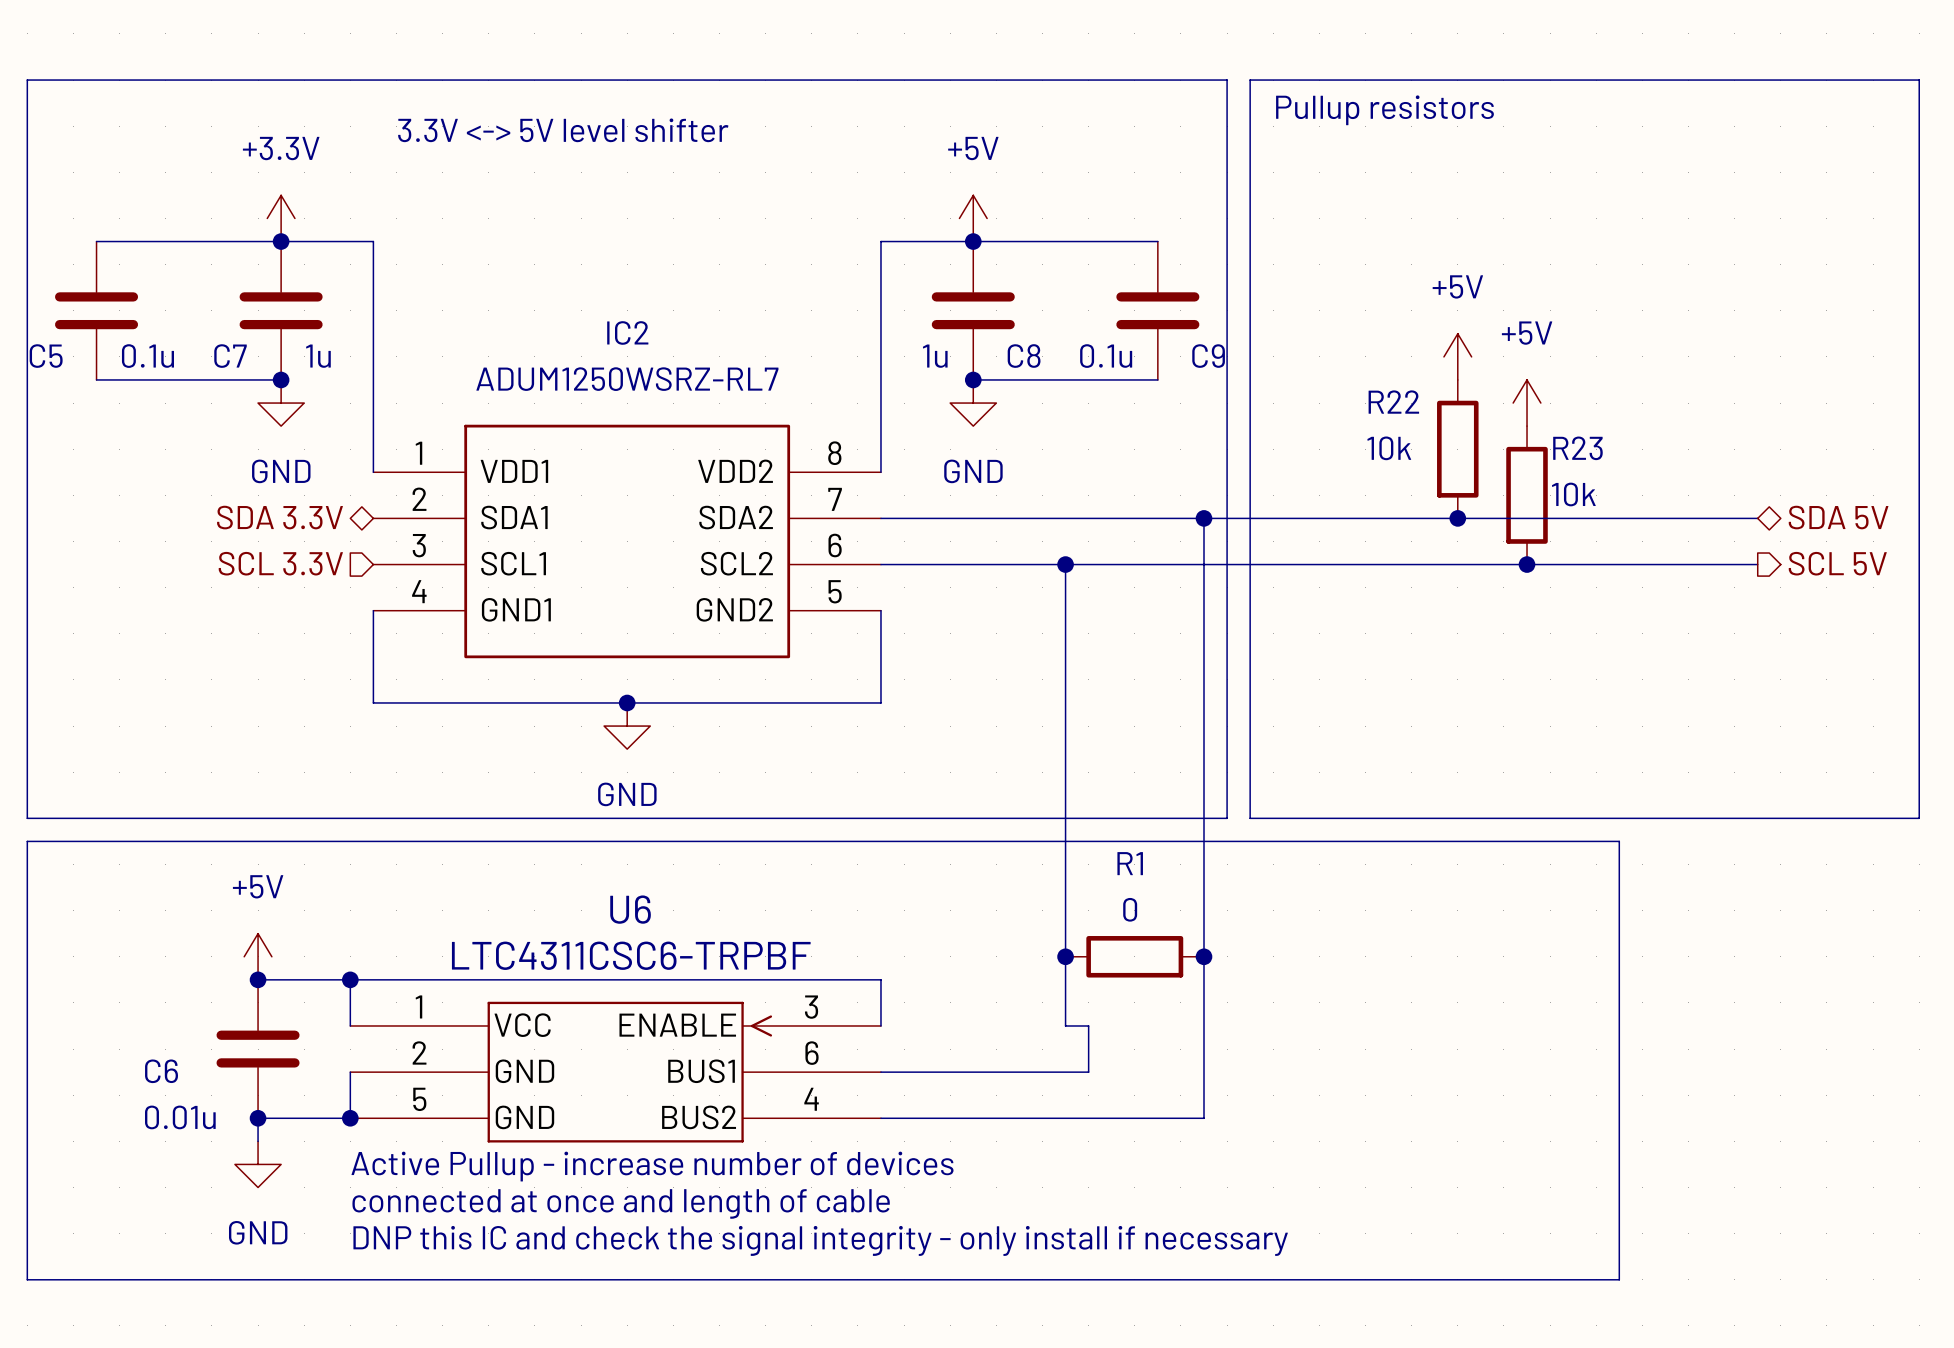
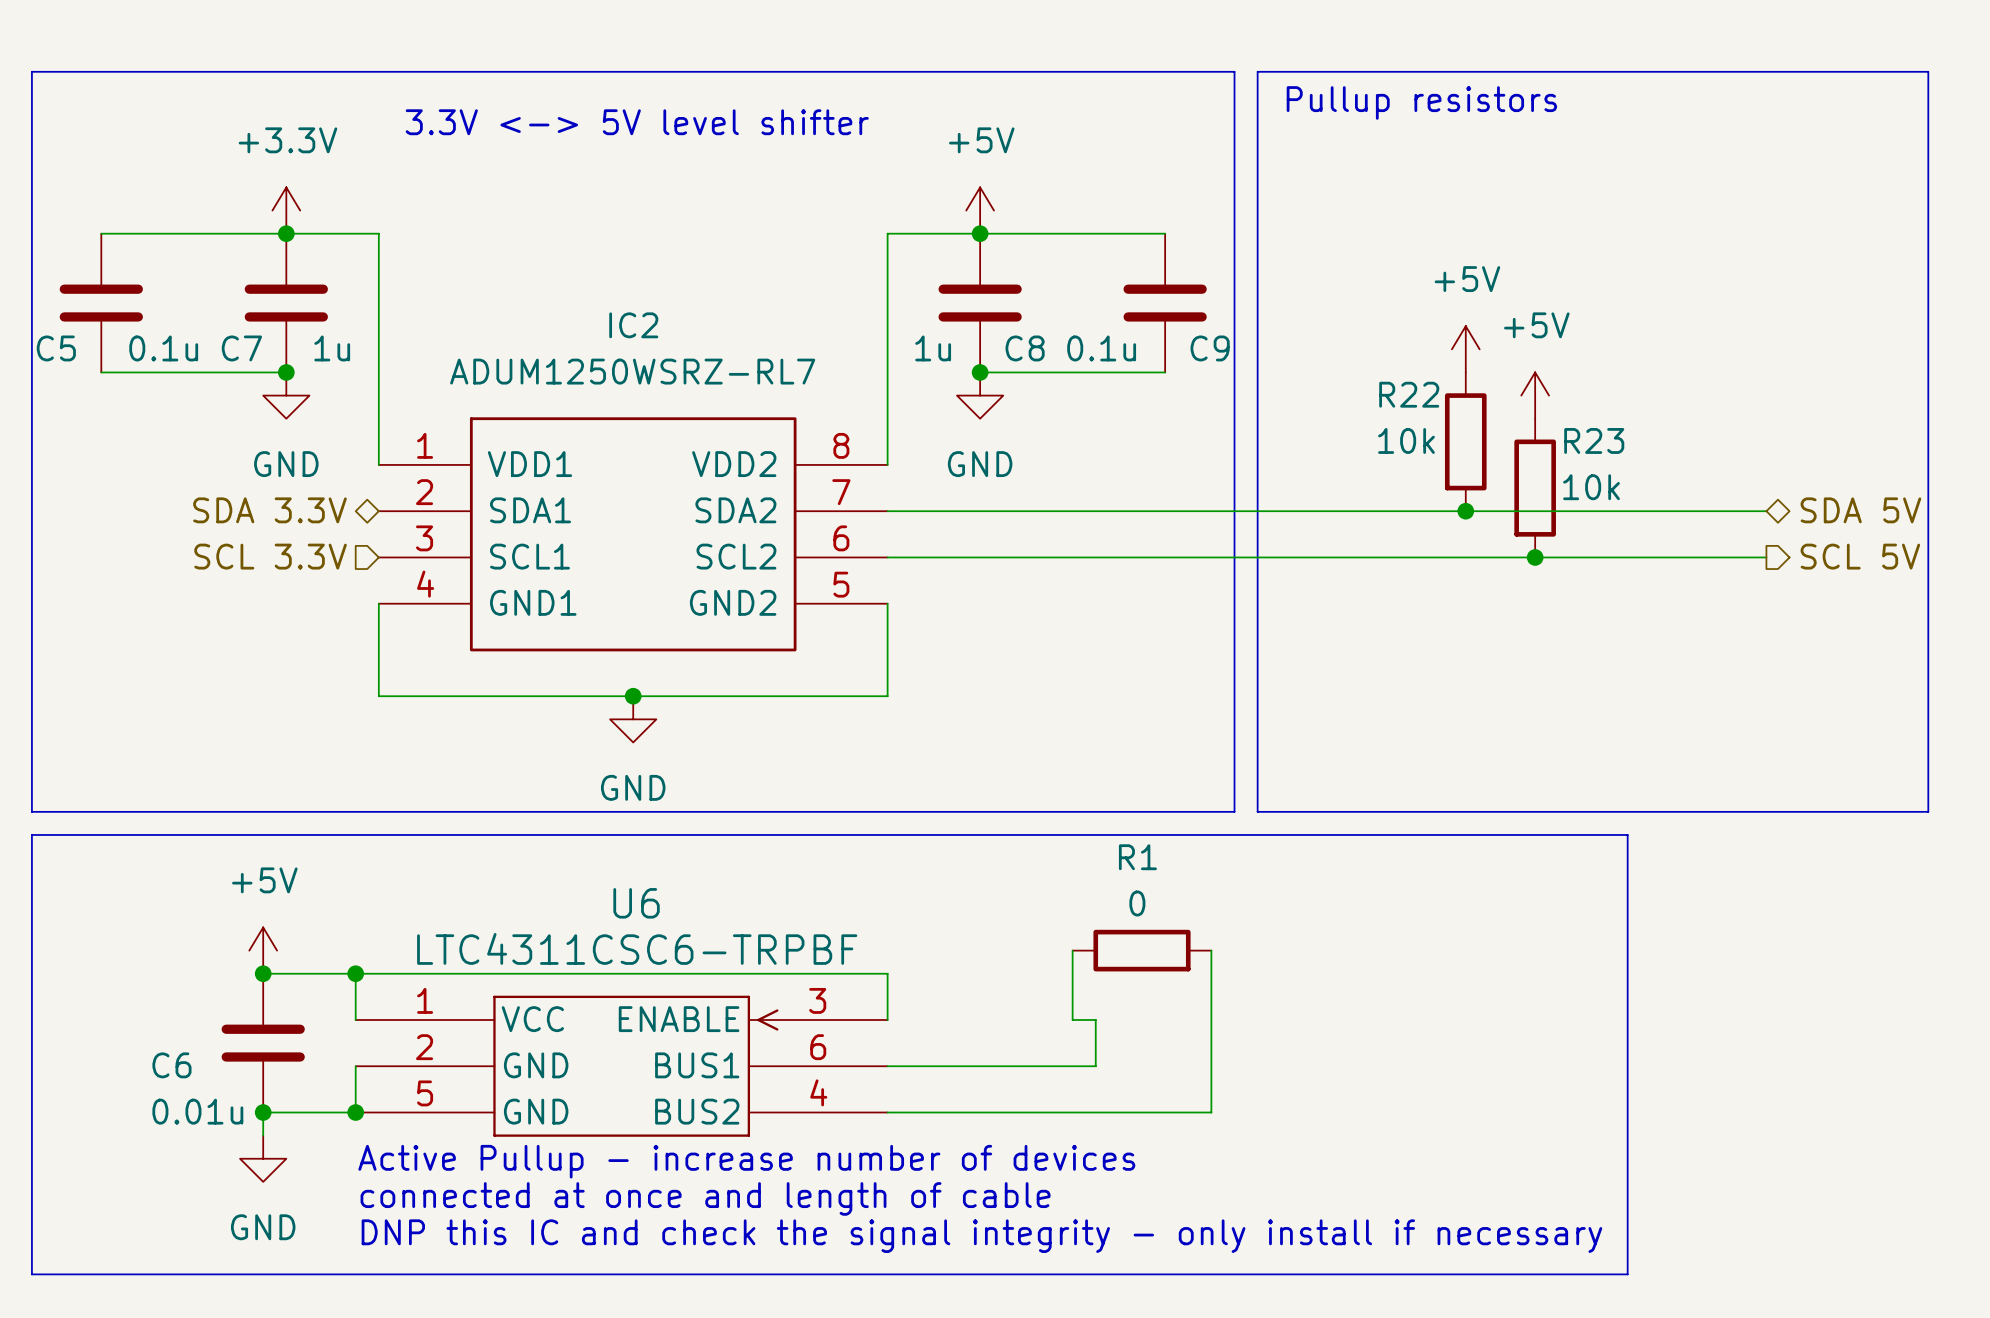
wire: (1204, 518) (1204, 956) -> none
junction: (1204, 518) -> none
wire: (1065, 564) (1065, 956) -> none
junction: (1065, 564) -> none
junction: (1065, 956) -> none
junction: (1204, 956) -> none

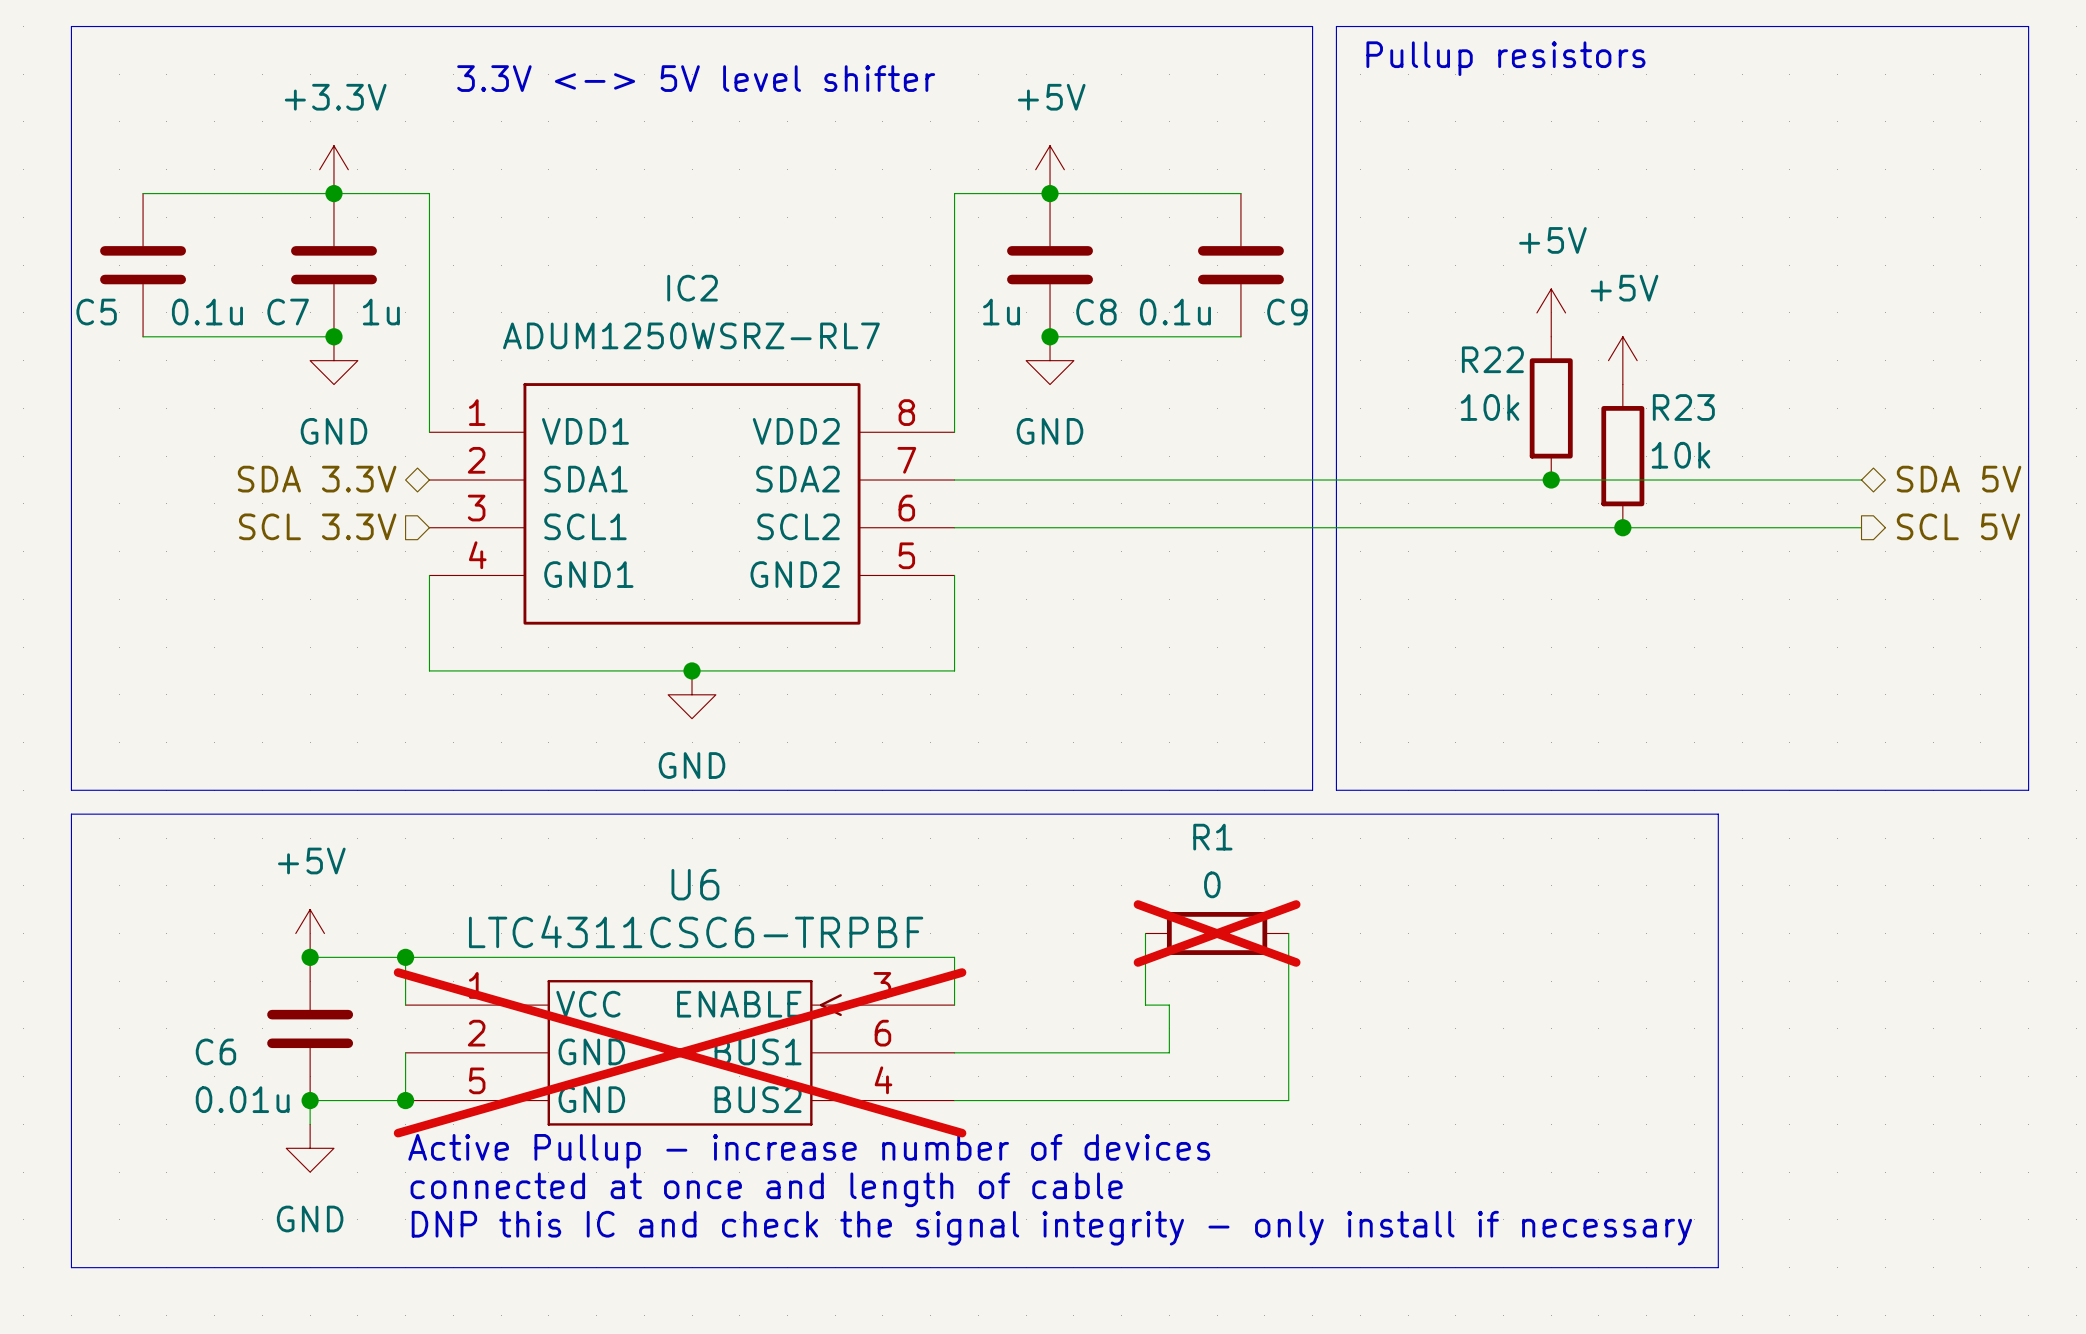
R1 do-not-place cross: none -> (1217, 933)
U6 do-not-place cross: none -> (680, 1052)

